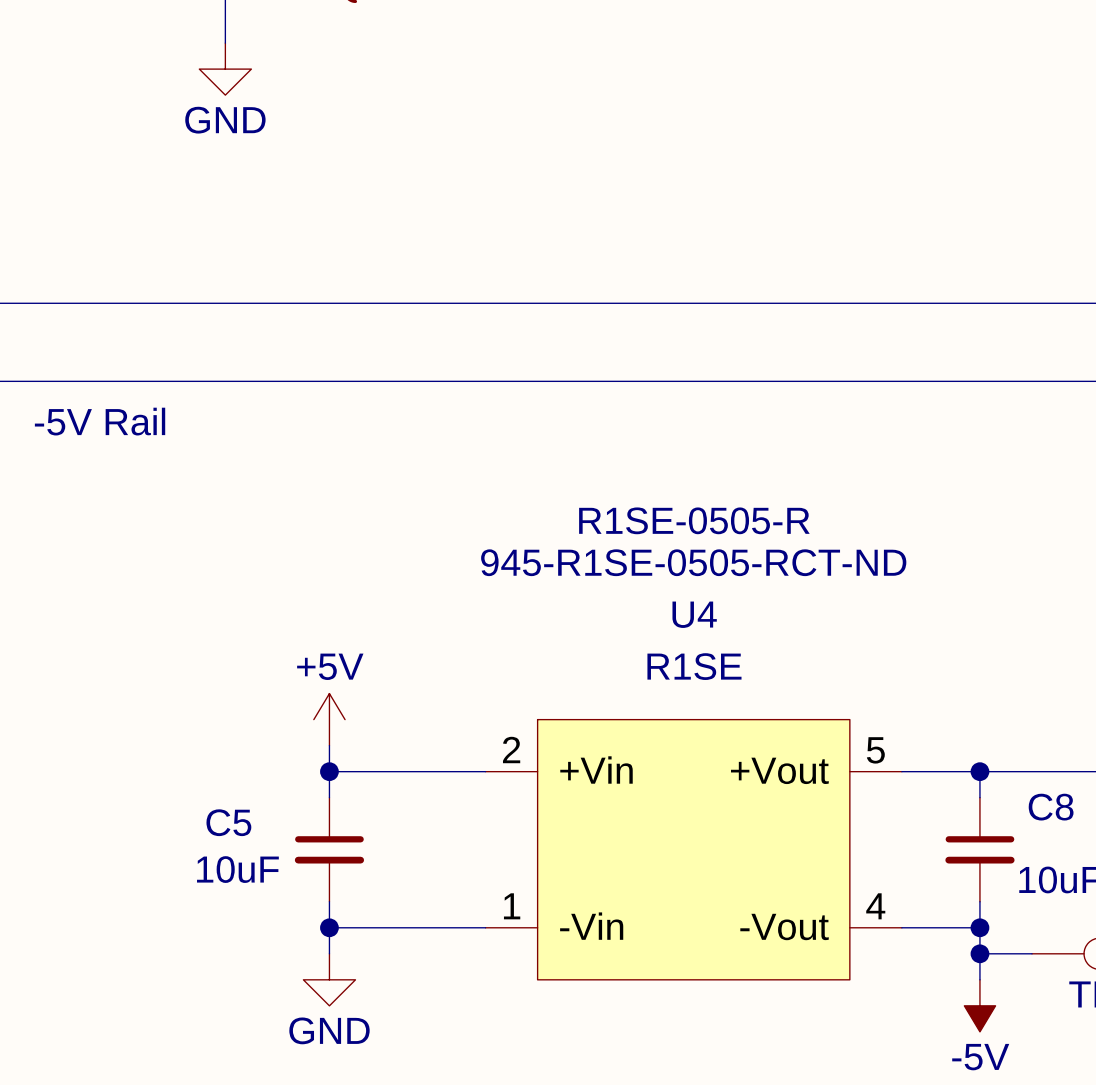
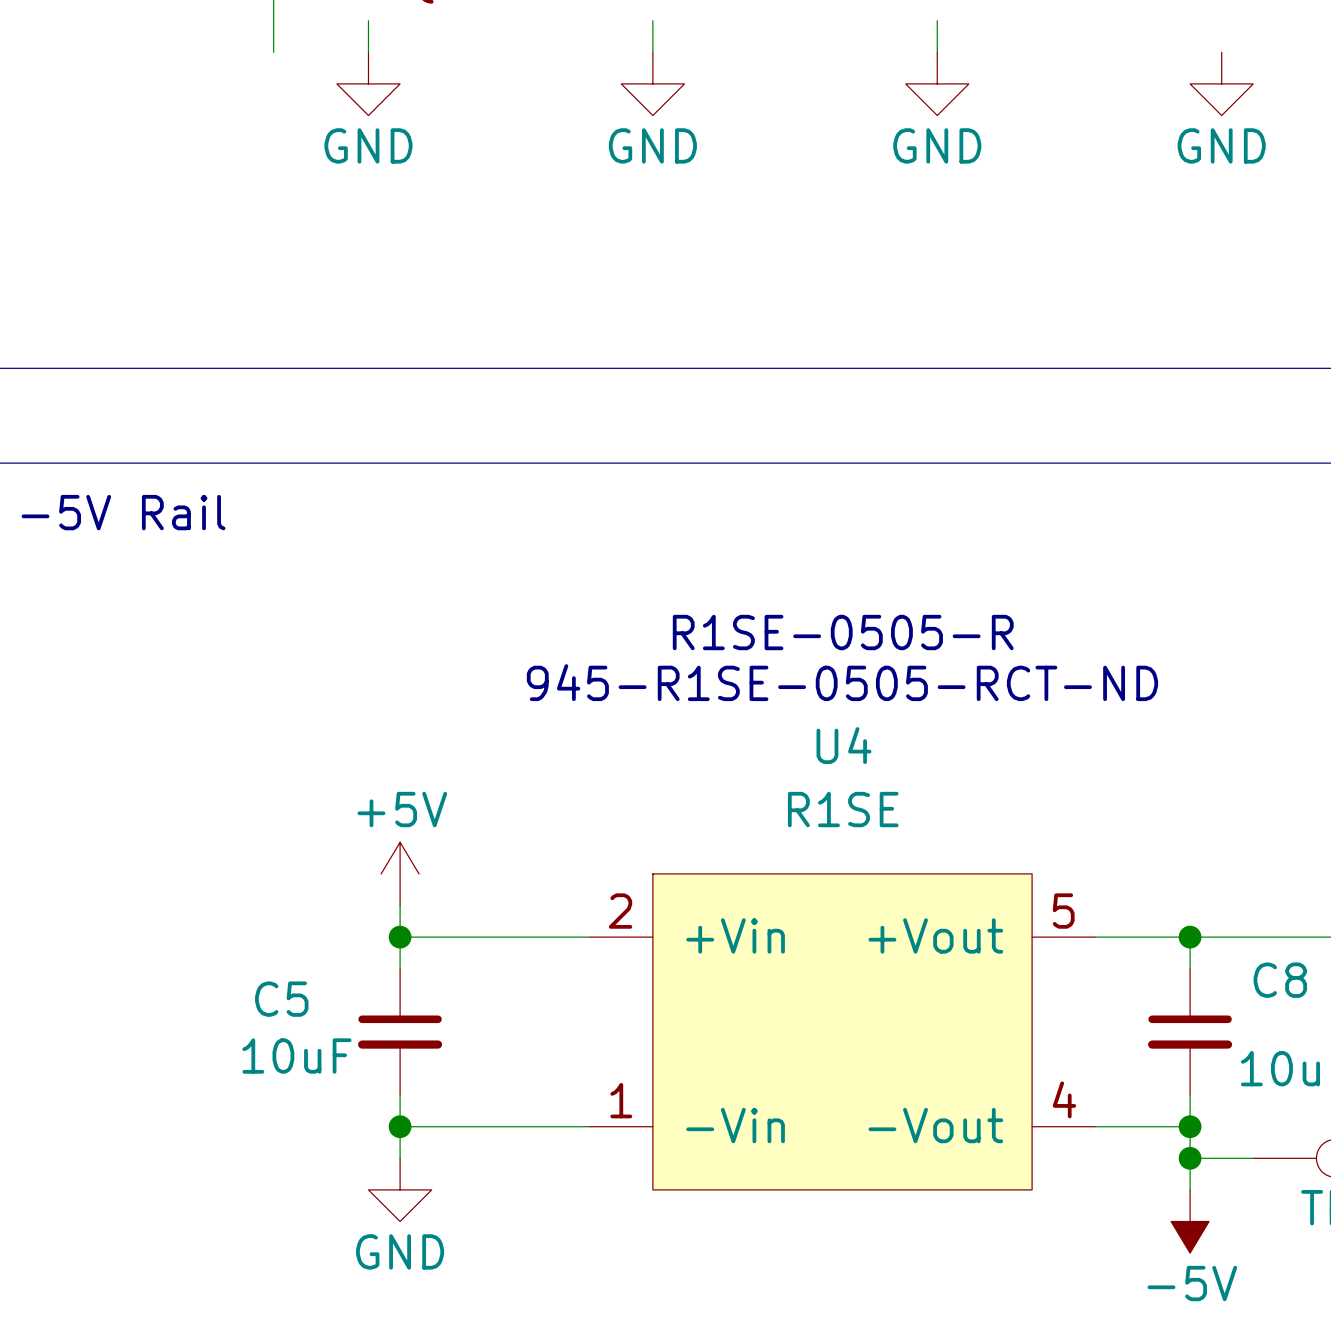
wire: none -> (368, 20) (368, 52)
wire: none -> (652, 20) (652, 52)
wire: none -> (937, 20) (937, 52)
power symbol position: GND (225, 69) -> GND (368, 83)
power symbol: none -> GND (652, 83)
power symbol: none -> GND (937, 83)
power symbol: none -> GND (1221, 83)

